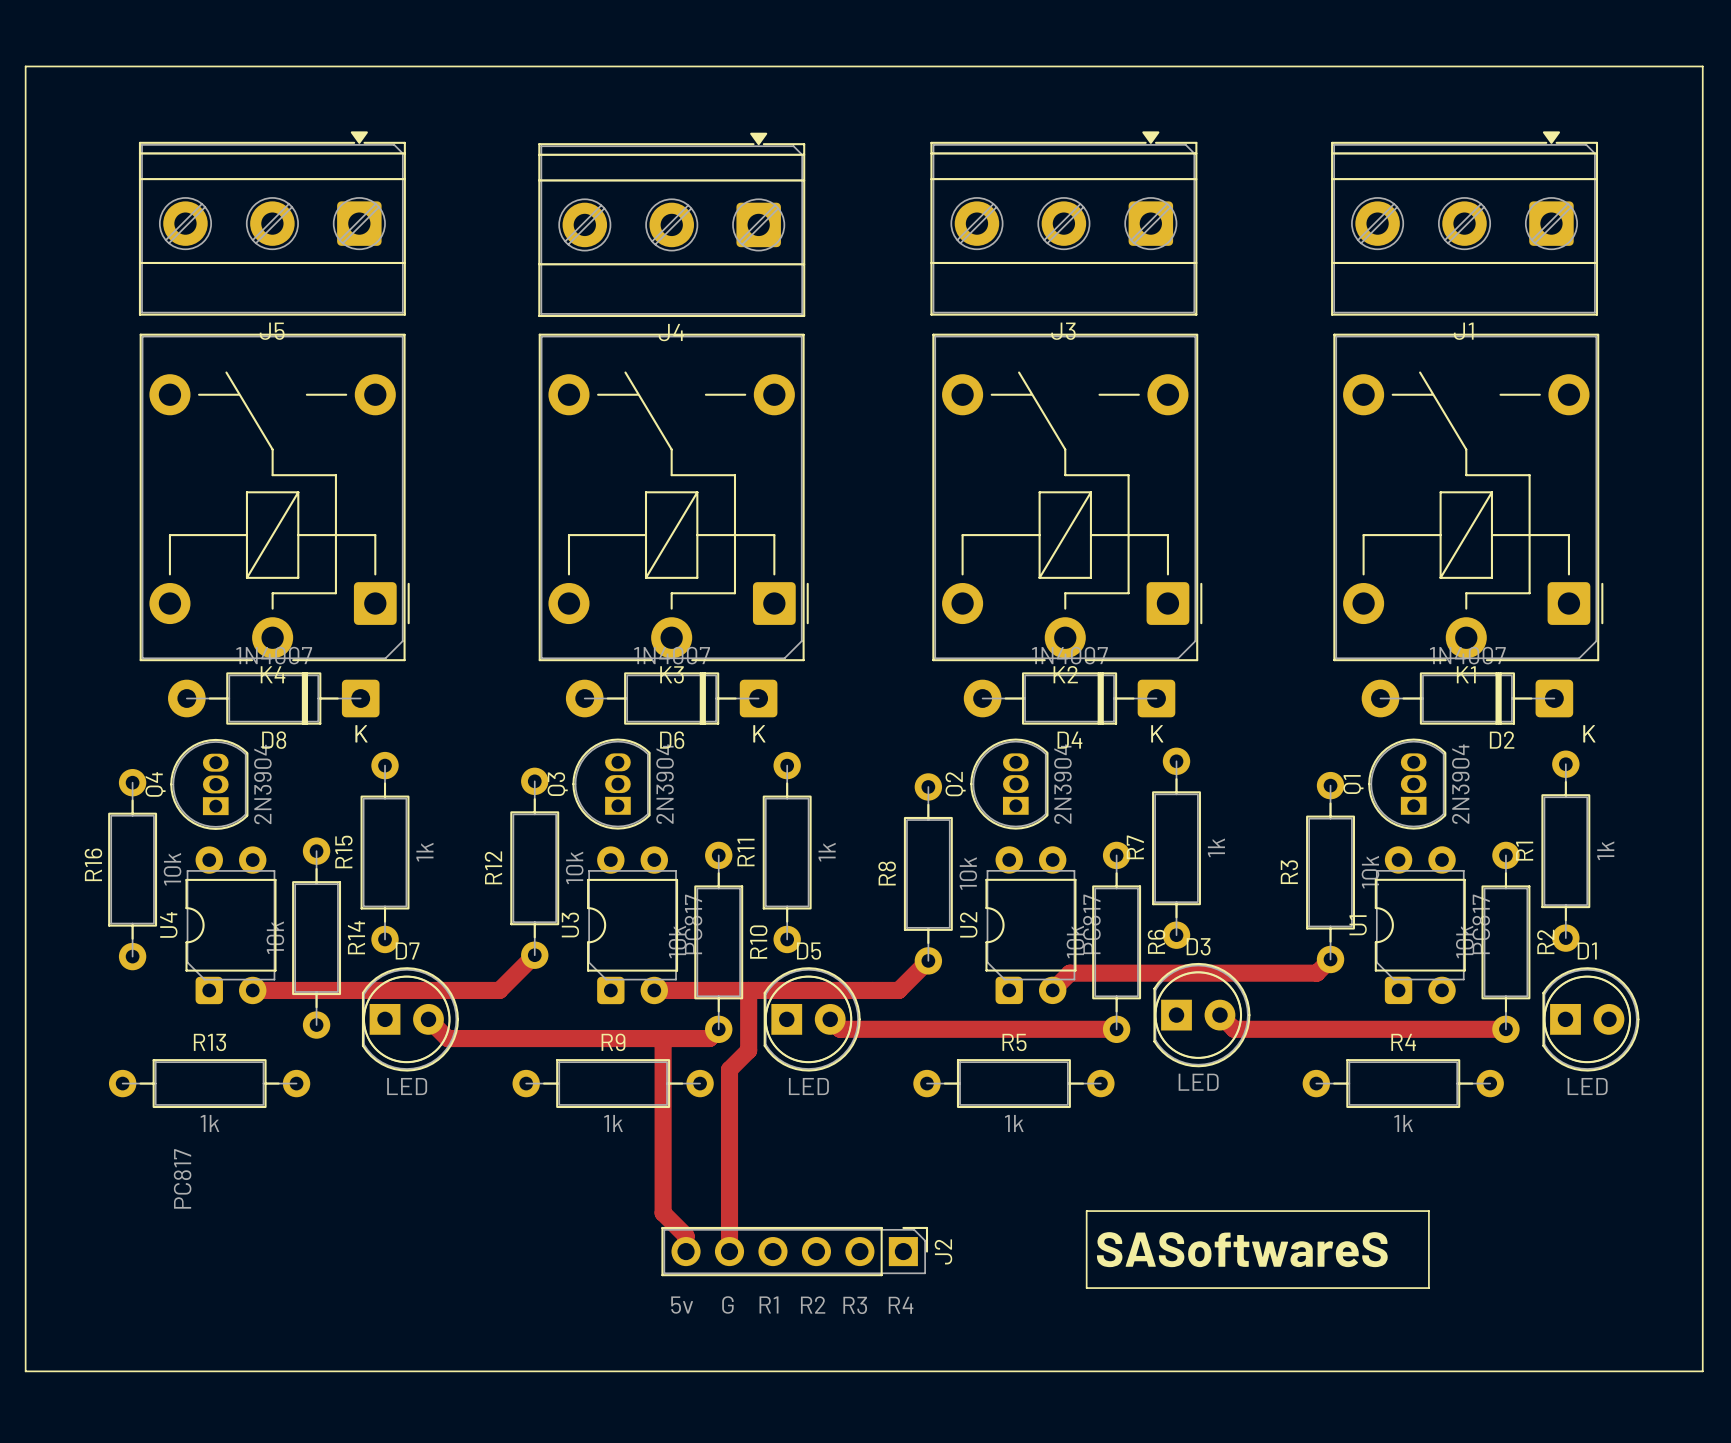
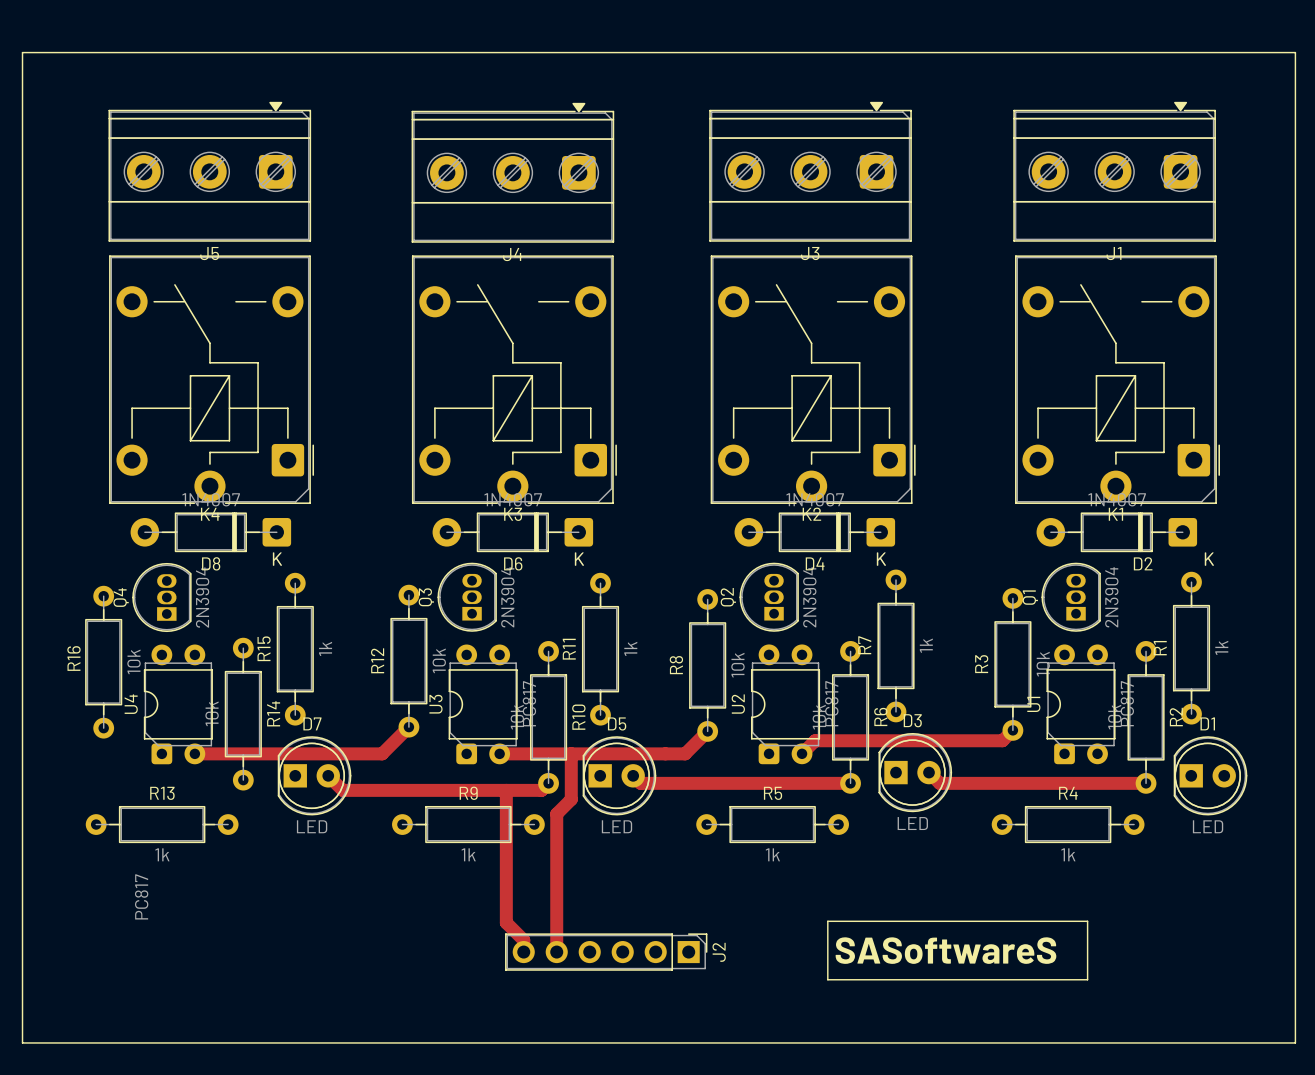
text: G (727, 1304) -> none
text: R1 (769, 1304) -> none
text: 5v (682, 1305) -> none
text: R2 (813, 1305) -> none
text: R3 (855, 1305) -> none
text: R4 (901, 1305) -> none

